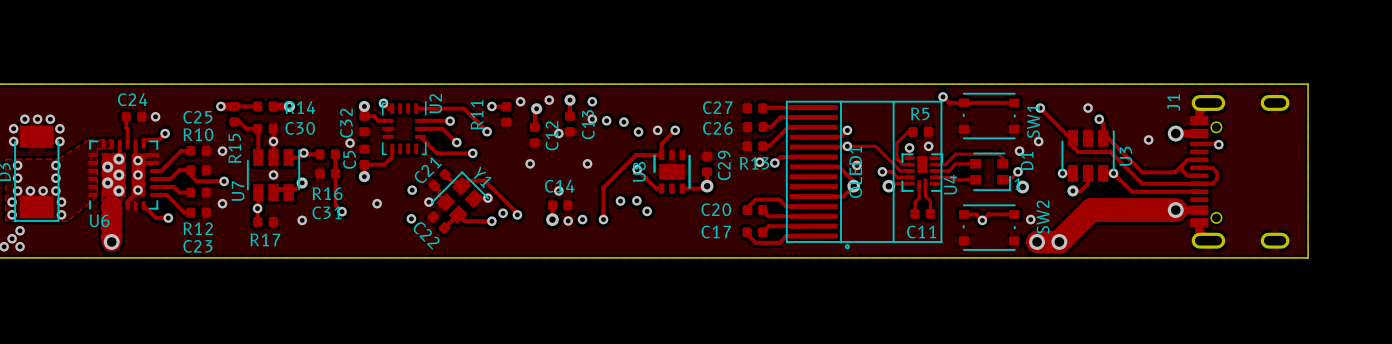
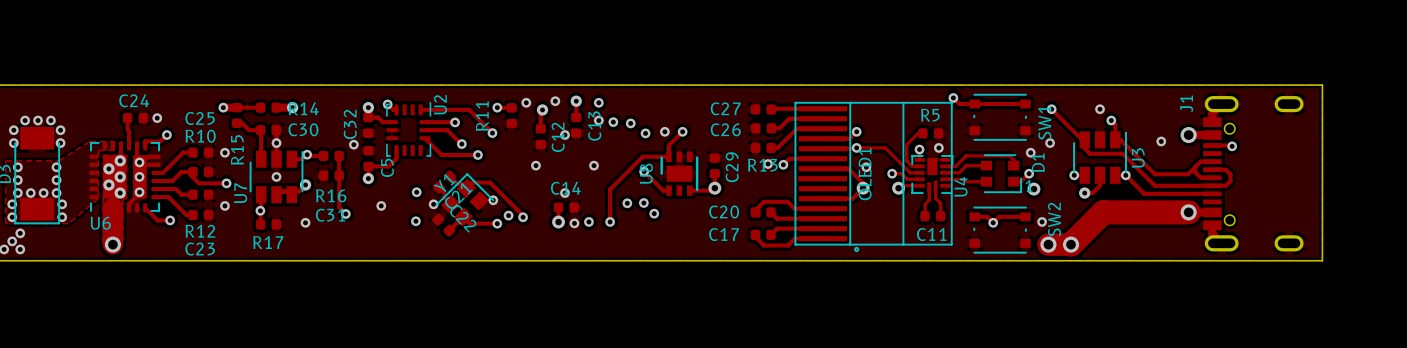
C5 name position: C5 (349, 159) -> C5 (387, 167)
C21 name position: C21 (428, 170) -> C21 (458, 195)
Y1 name rotation: 0° (482, 177) -> 90° counterclockwise (444, 183)
Y1 name position: Y1 (482, 177) -> Y1 (444, 183)
C22 name position: C22 (426, 235) -> C22 (463, 218)

